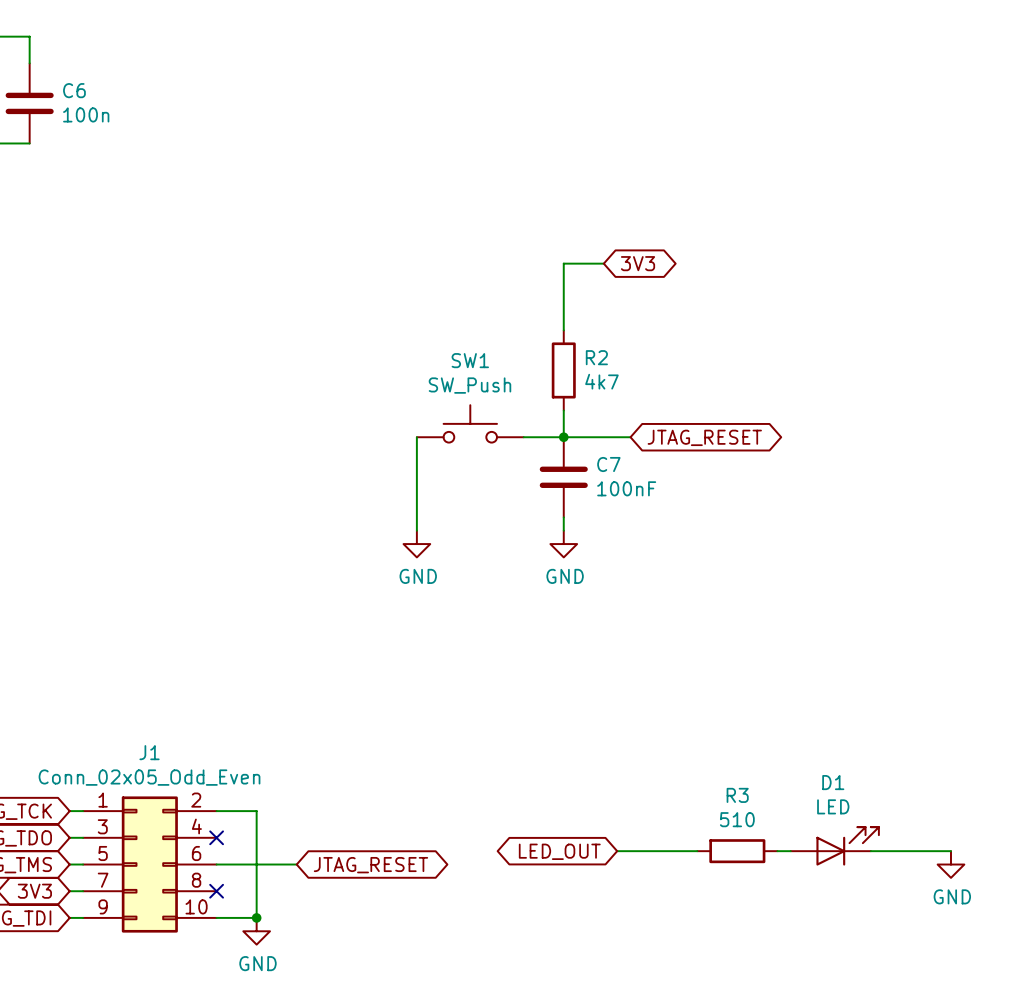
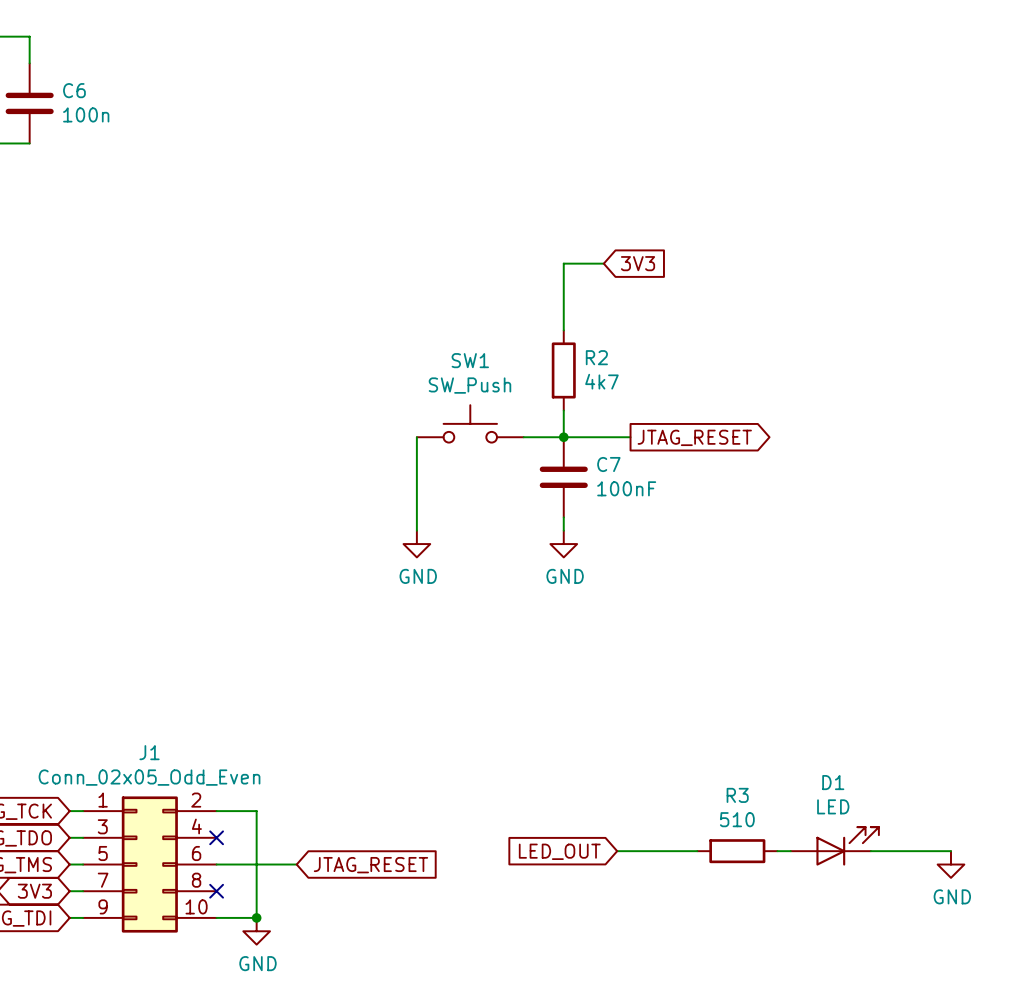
global label shape: bidirectional (638, 263) -> input (638, 263)
global label shape: bidirectional (704, 437) -> output (694, 437)
global label shape: bidirectional (559, 851) -> input (559, 851)
global label shape: bidirectional (370, 865) -> input (370, 865)

